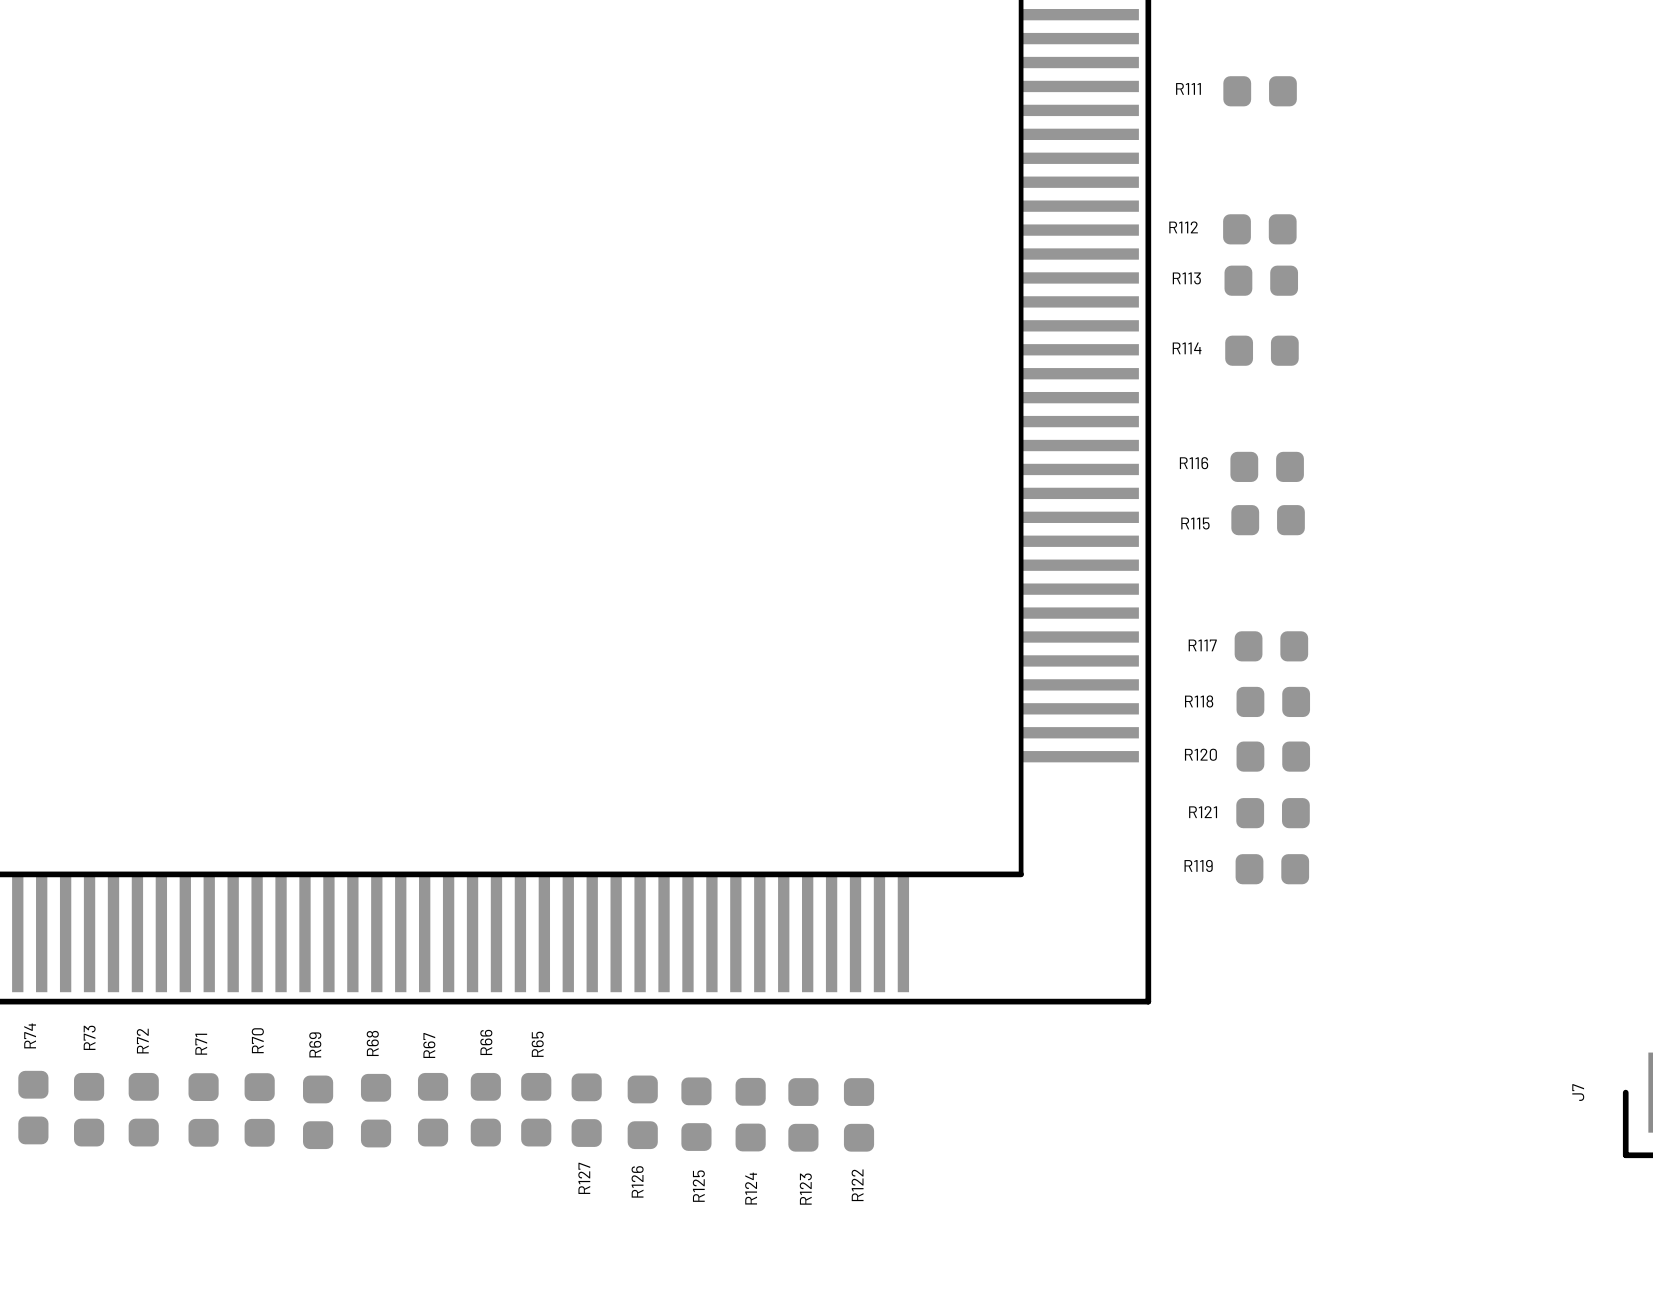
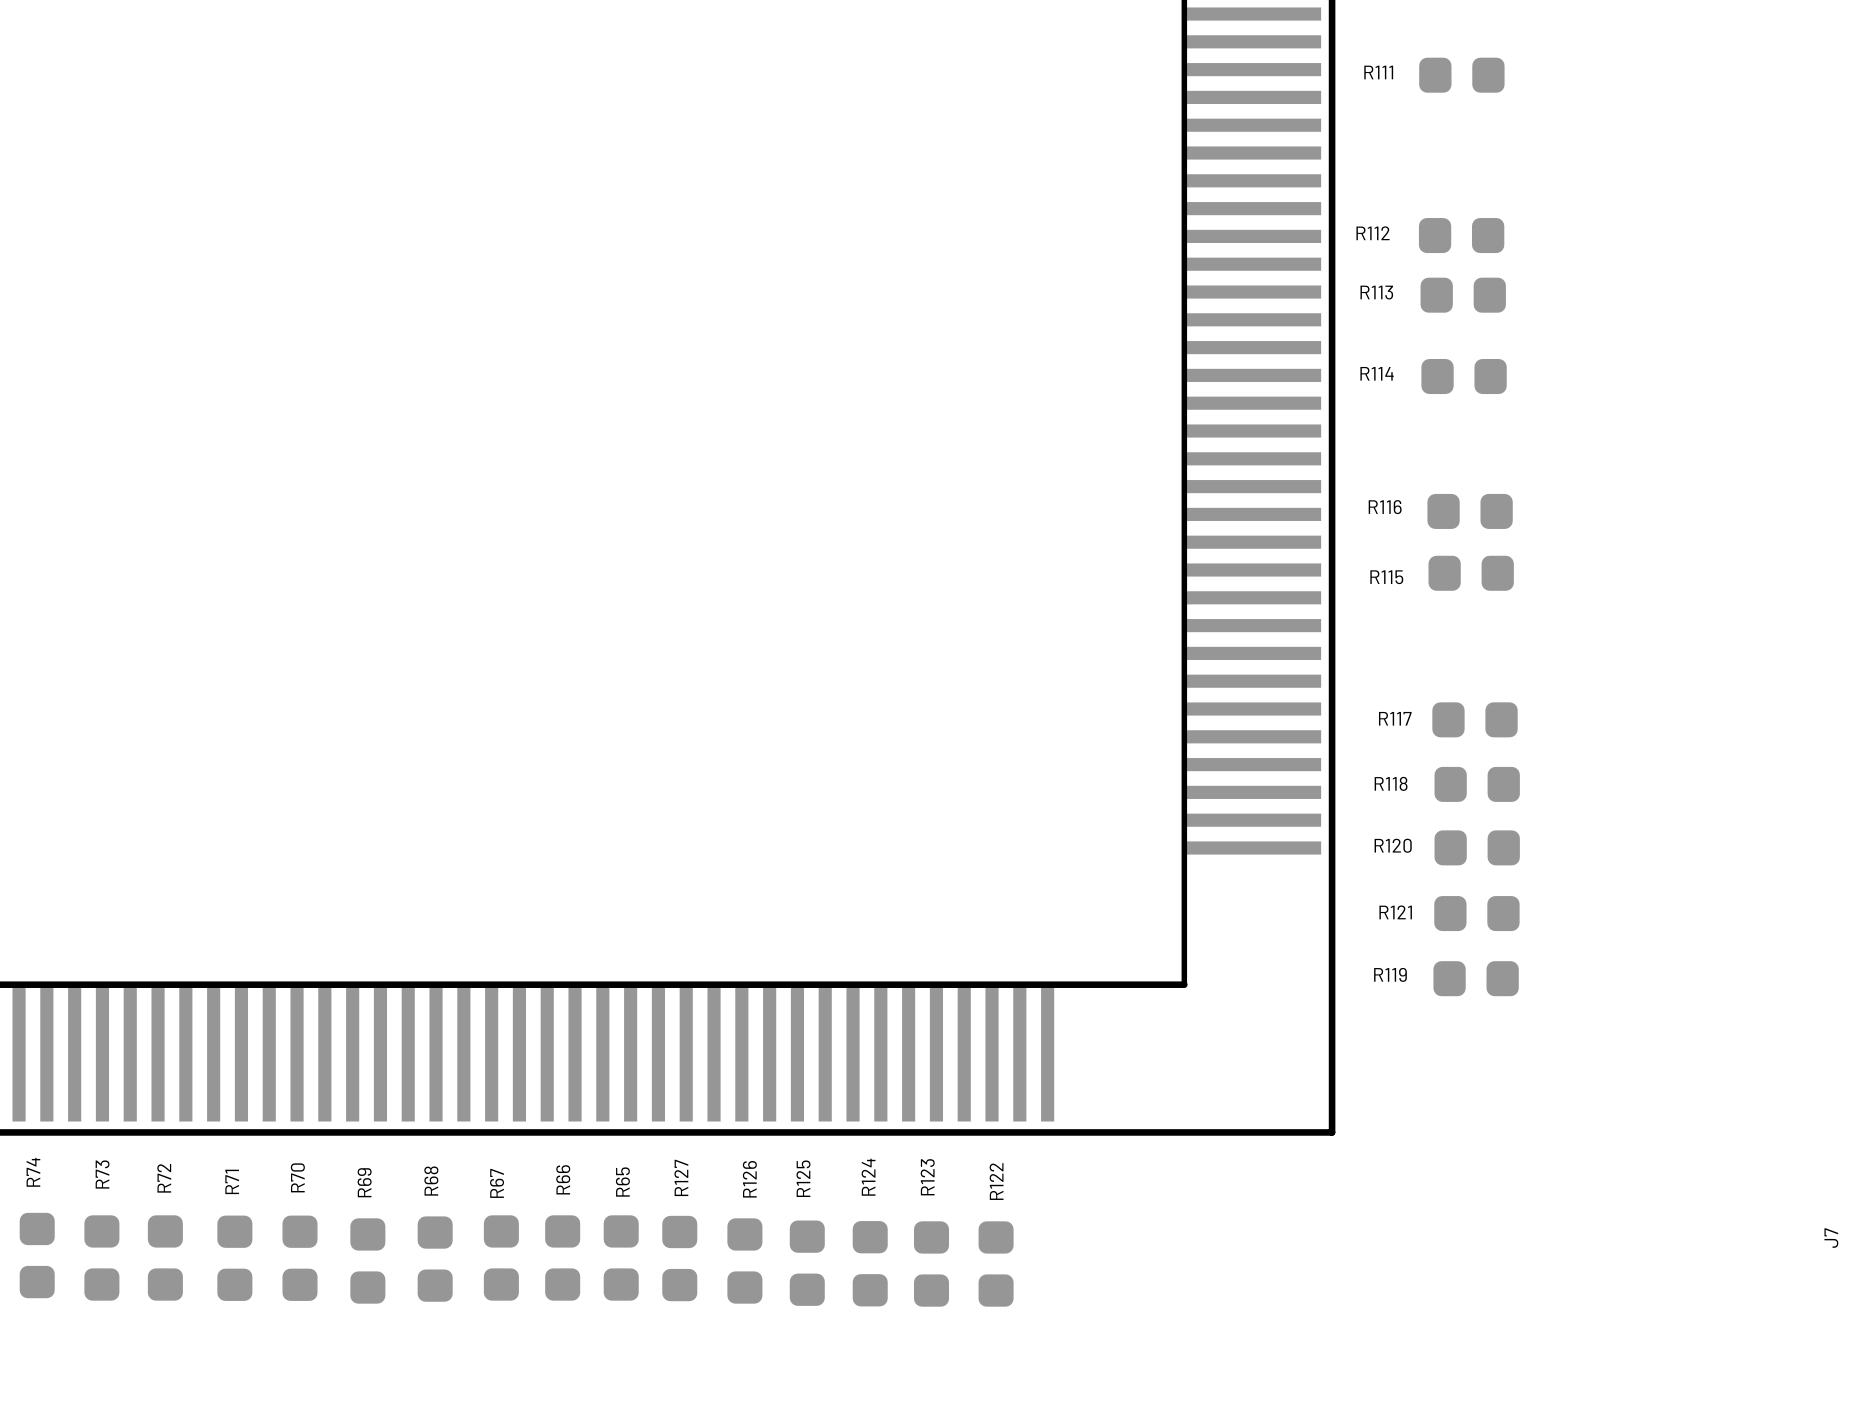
R127 name position: R127 (584, 1178) -> R127 (681, 1177)
R126 name position: R126 (637, 1181) -> R126 (749, 1179)
R122 name position: R122 (857, 1185) -> R122 (996, 1181)
R125 name position: R125 (698, 1186) -> R125 (803, 1178)
R124 name position: R124 (751, 1188) -> R124 (868, 1177)
R123 name position: R123 (805, 1189) -> R123 (927, 1177)

